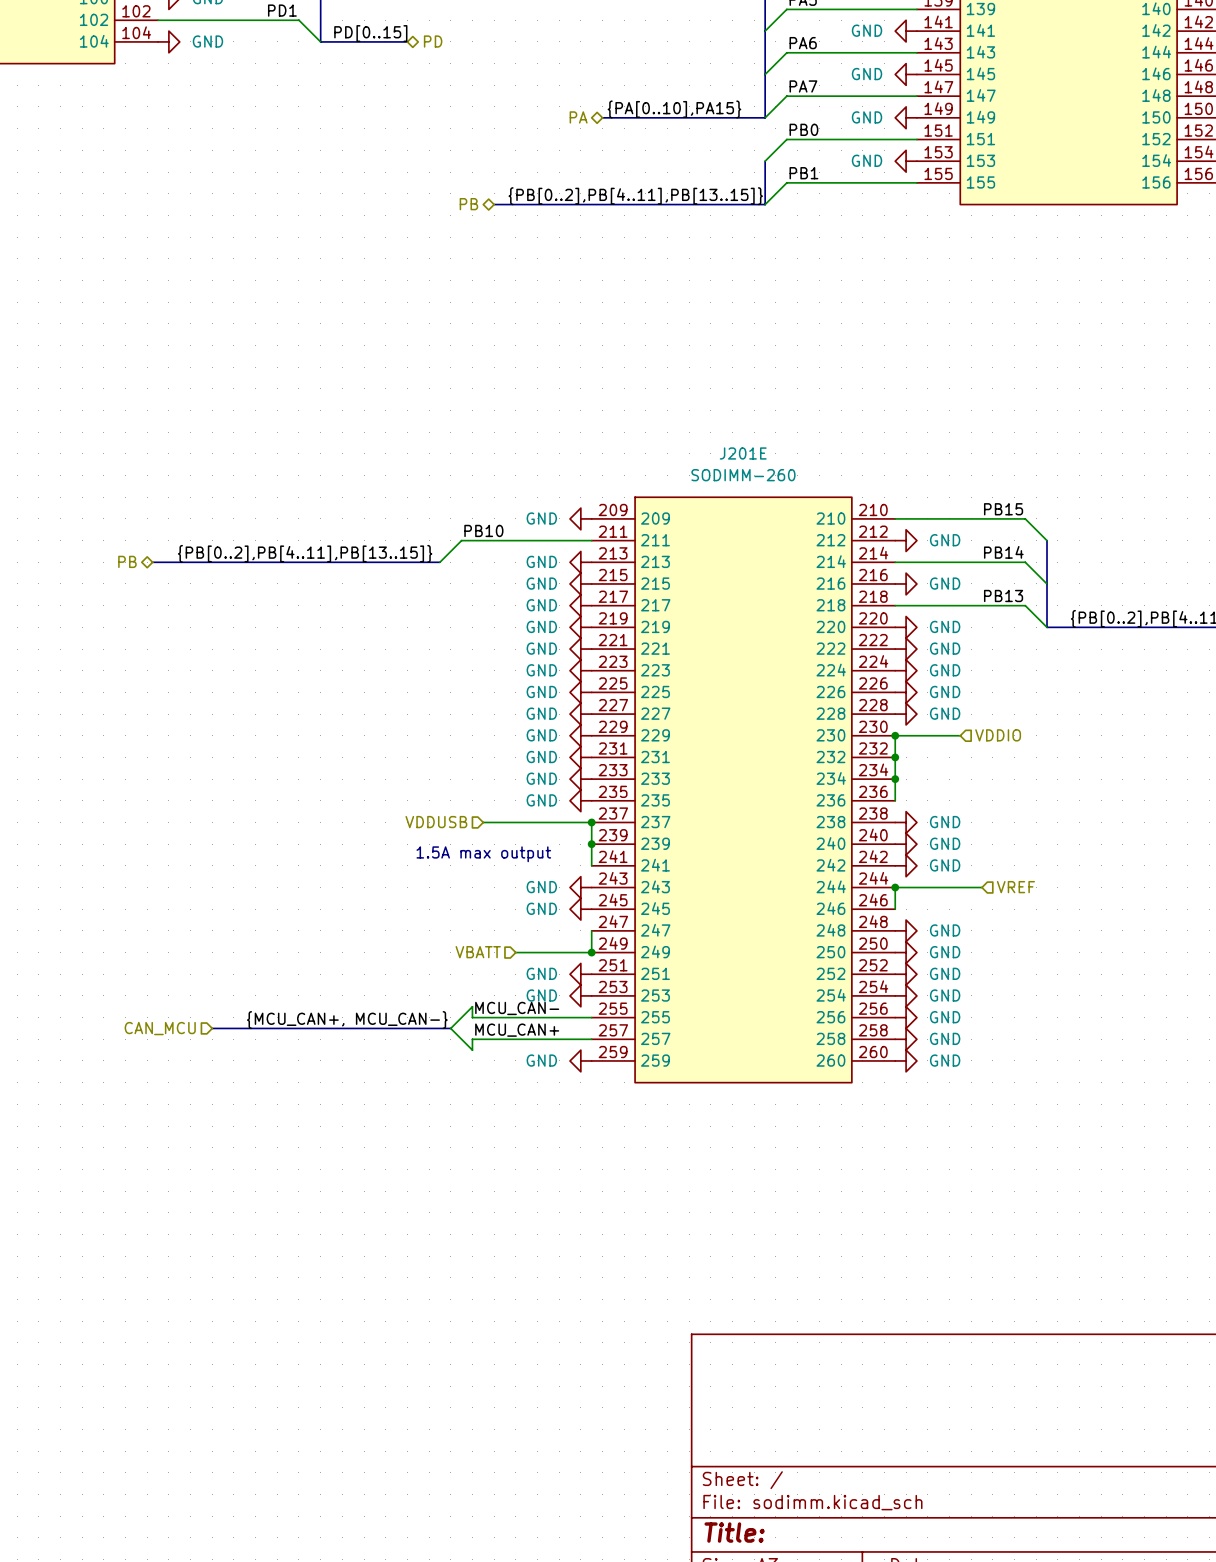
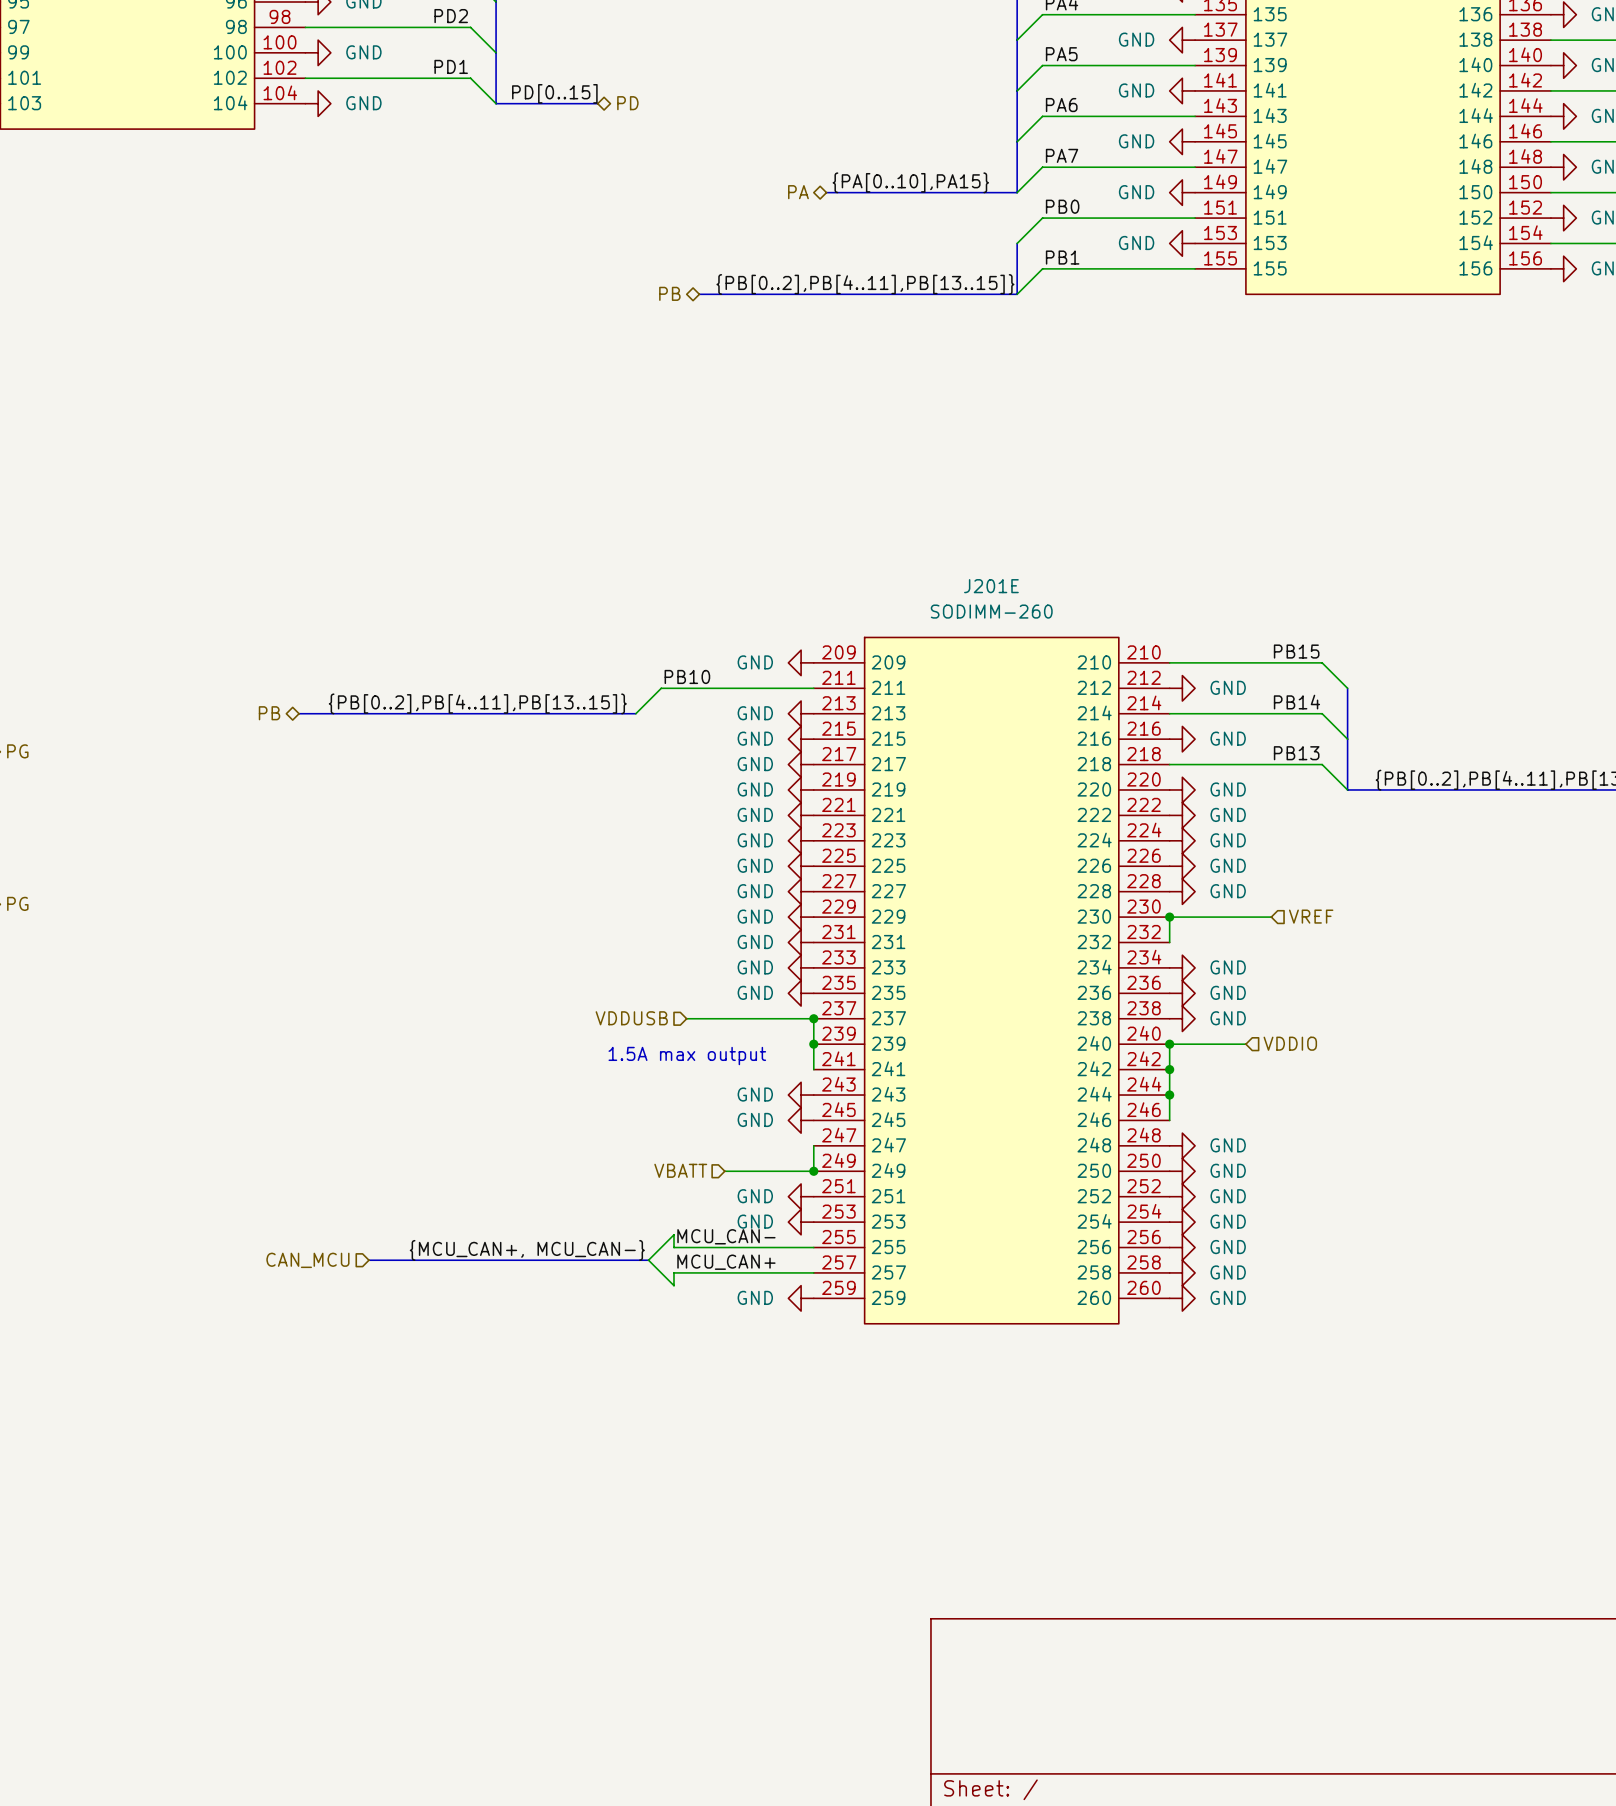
wire: none -> (1245, 917) (1271, 917)
hierarchical label position: VDDIO (998, 735) -> VDDIO (1290, 1043)
wire: (895, 757) (895, 800) -> none
junction: (895, 757) -> none
junction: (895, 779) -> none
power symbol: none -> GND (1182, 967)
power symbol: none -> GND (1182, 993)
junction: none -> (1169, 1044)
power symbol: GND (906, 844) -> none
junction: none -> (1169, 1069)
power symbol: GND (906, 865) -> none
wire: (895, 887) (981, 887) -> (1169, 1095) (1169, 1044) (1245, 1044)
hierarchical label position: VREF (1015, 887) -> VREF (1311, 916)

